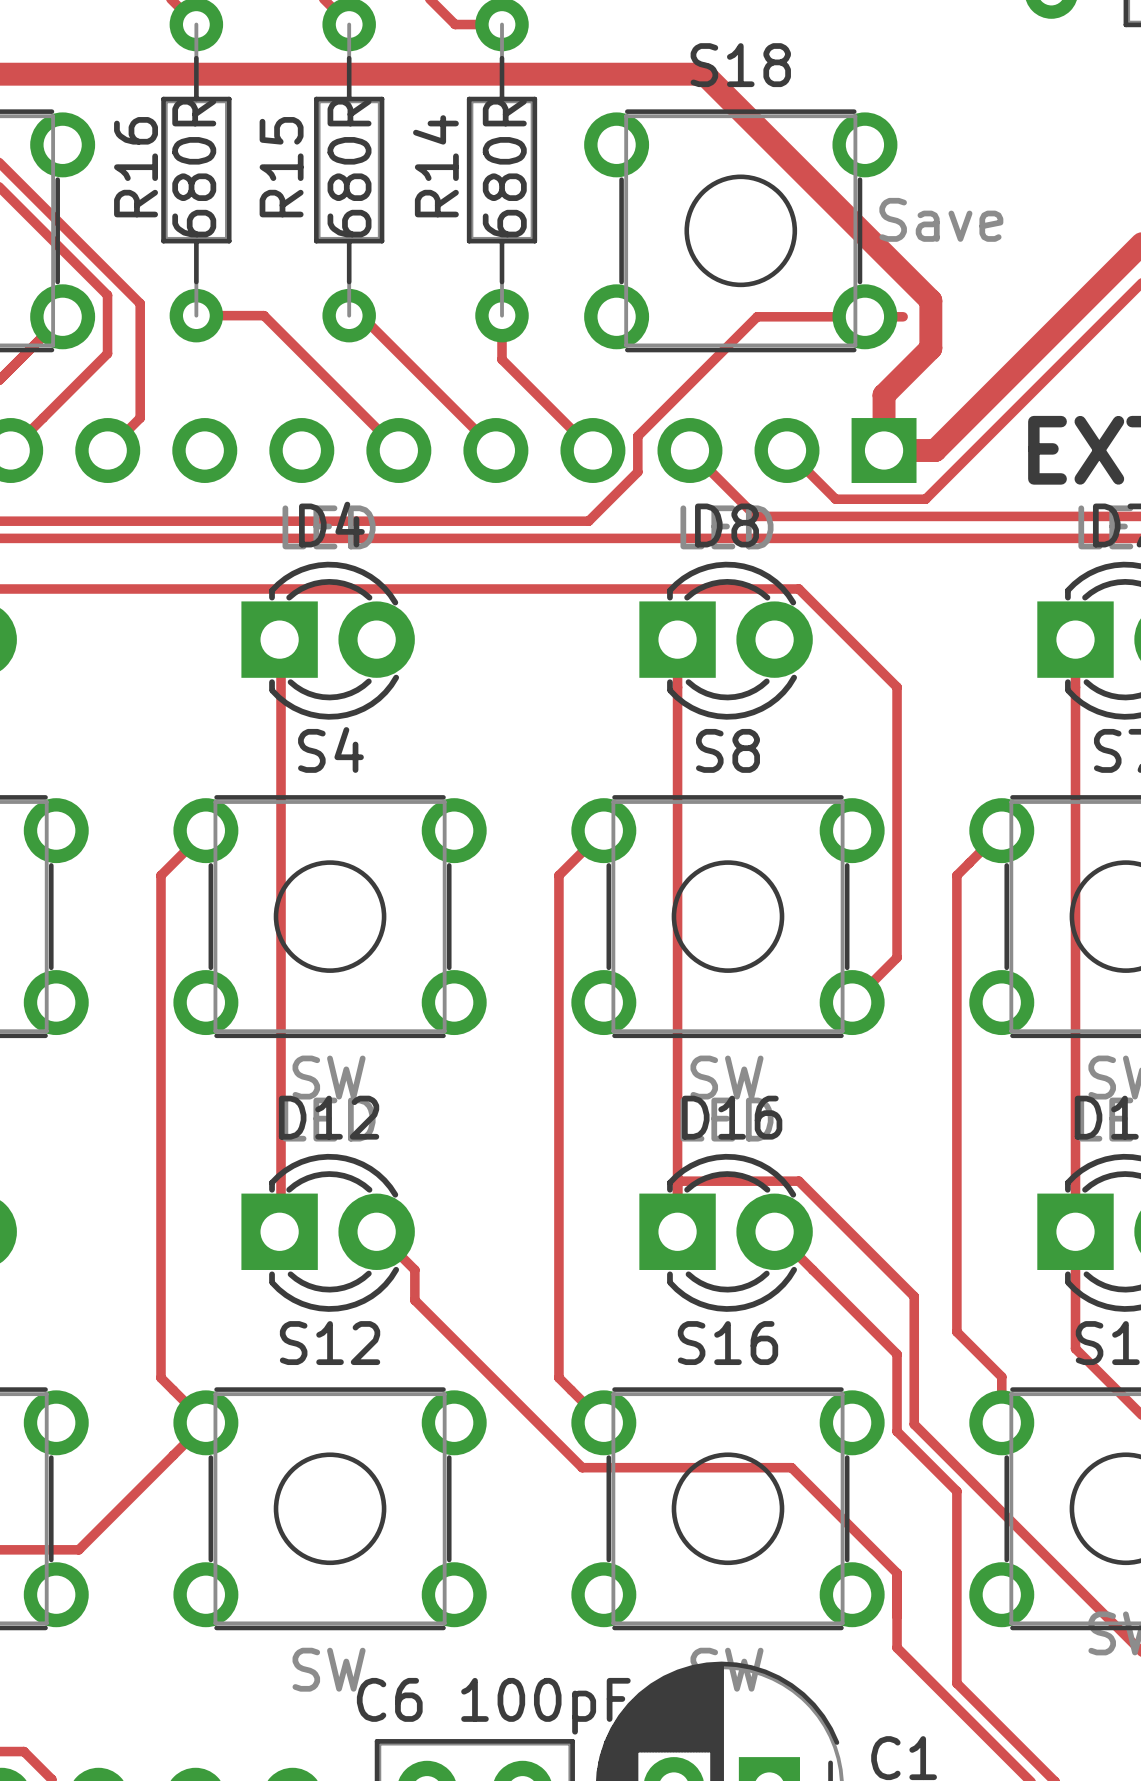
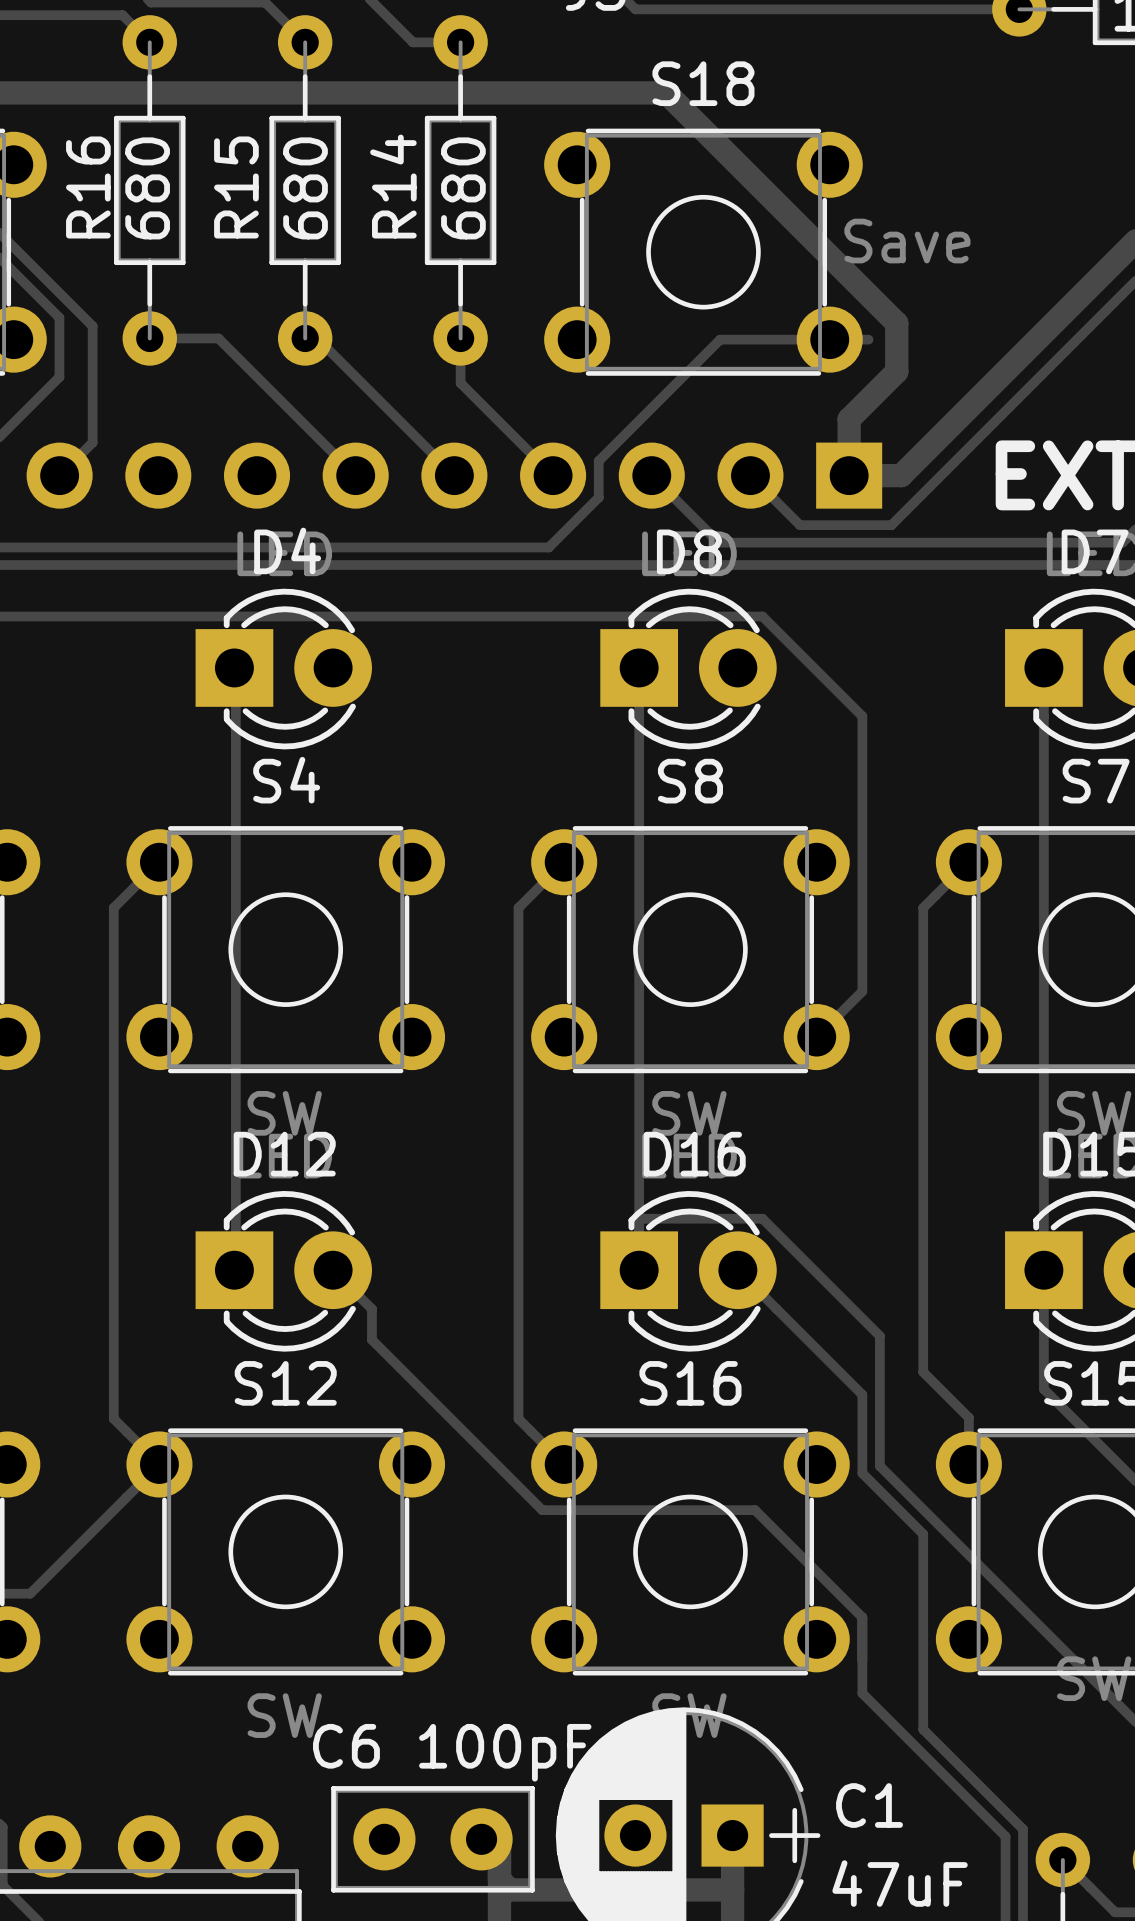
R15 value: 680R (194, 168) -> 680 (147, 188)
R16 value: 680R (349, 168) -> 680 (305, 188)
R14 value: 680R (504, 168) -> 680 (463, 188)

